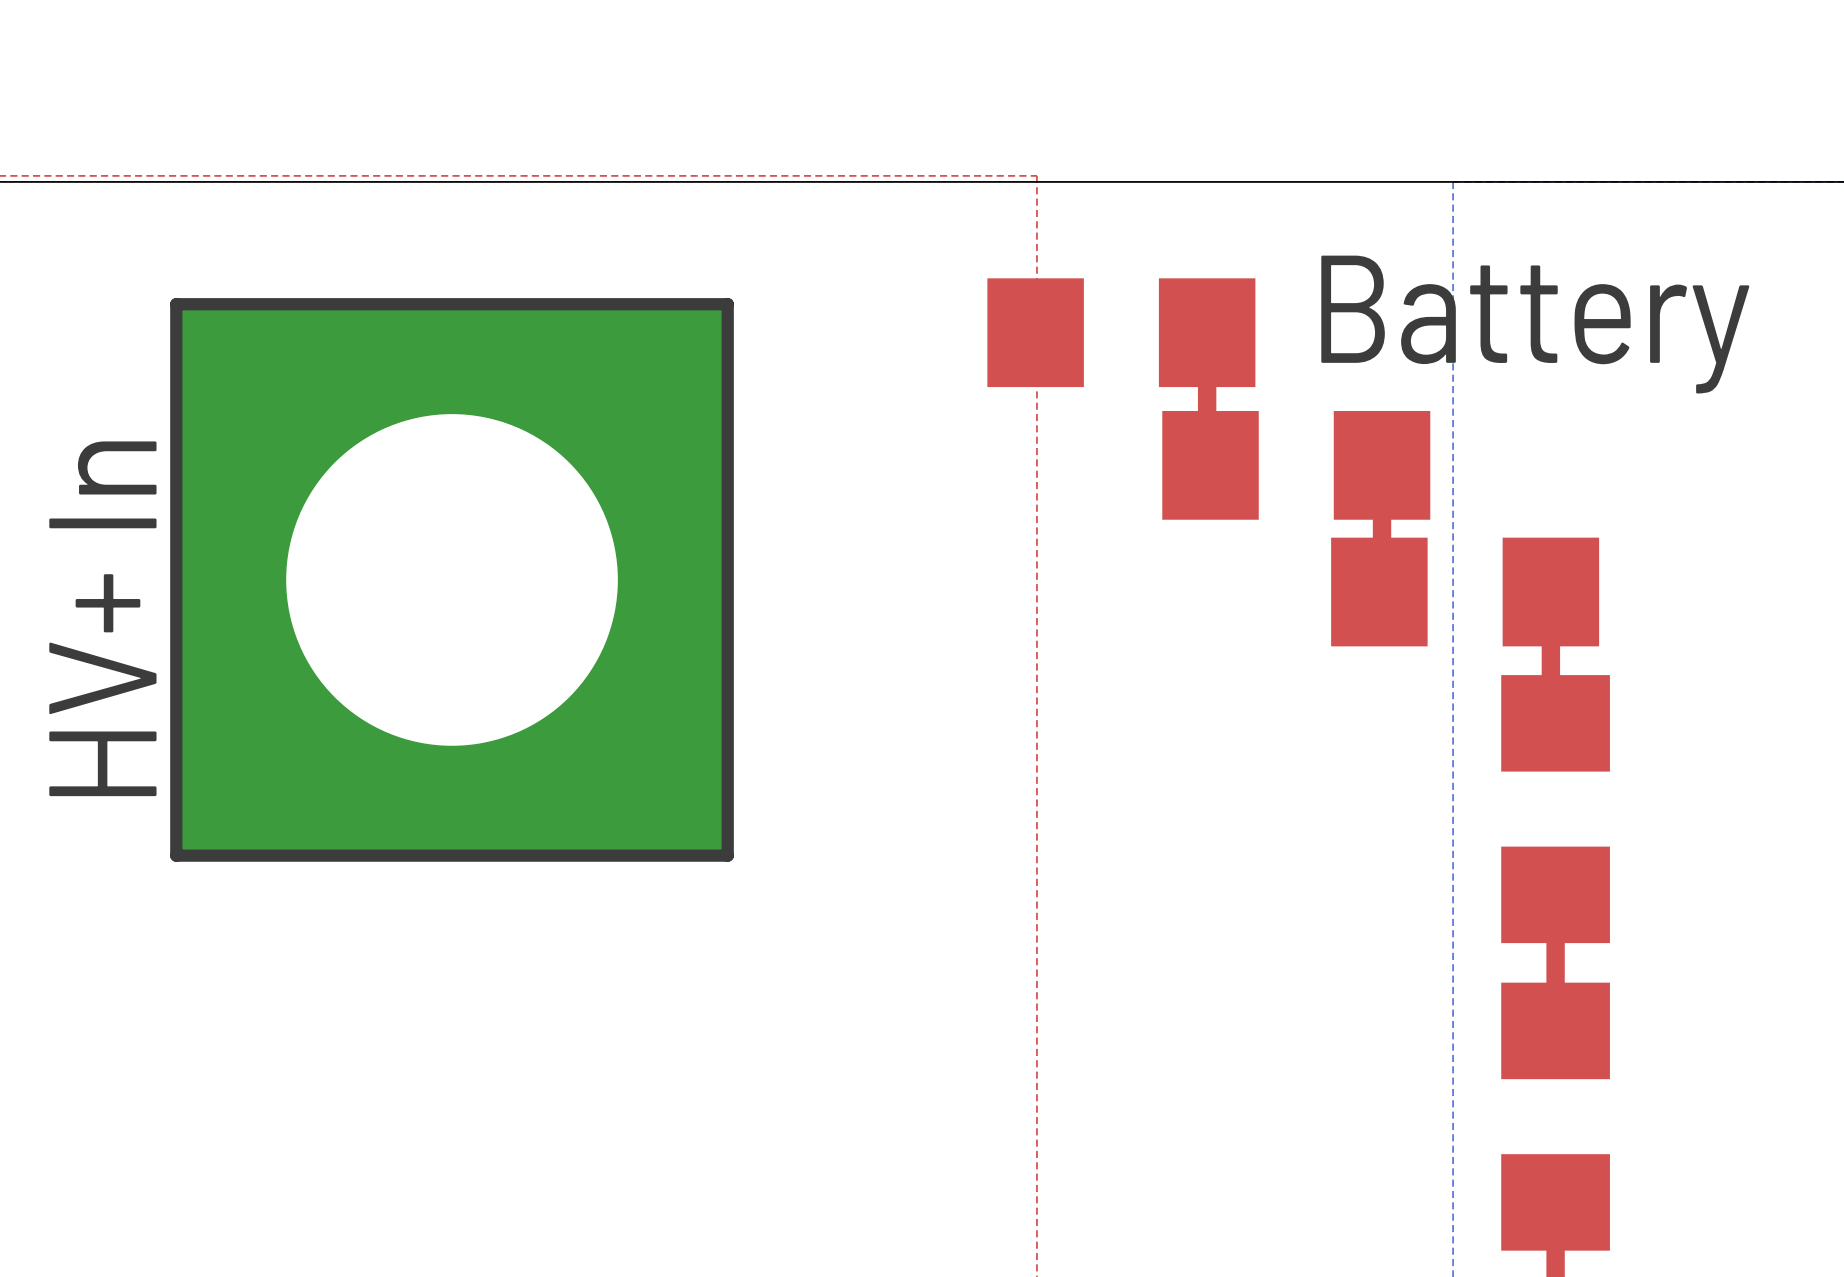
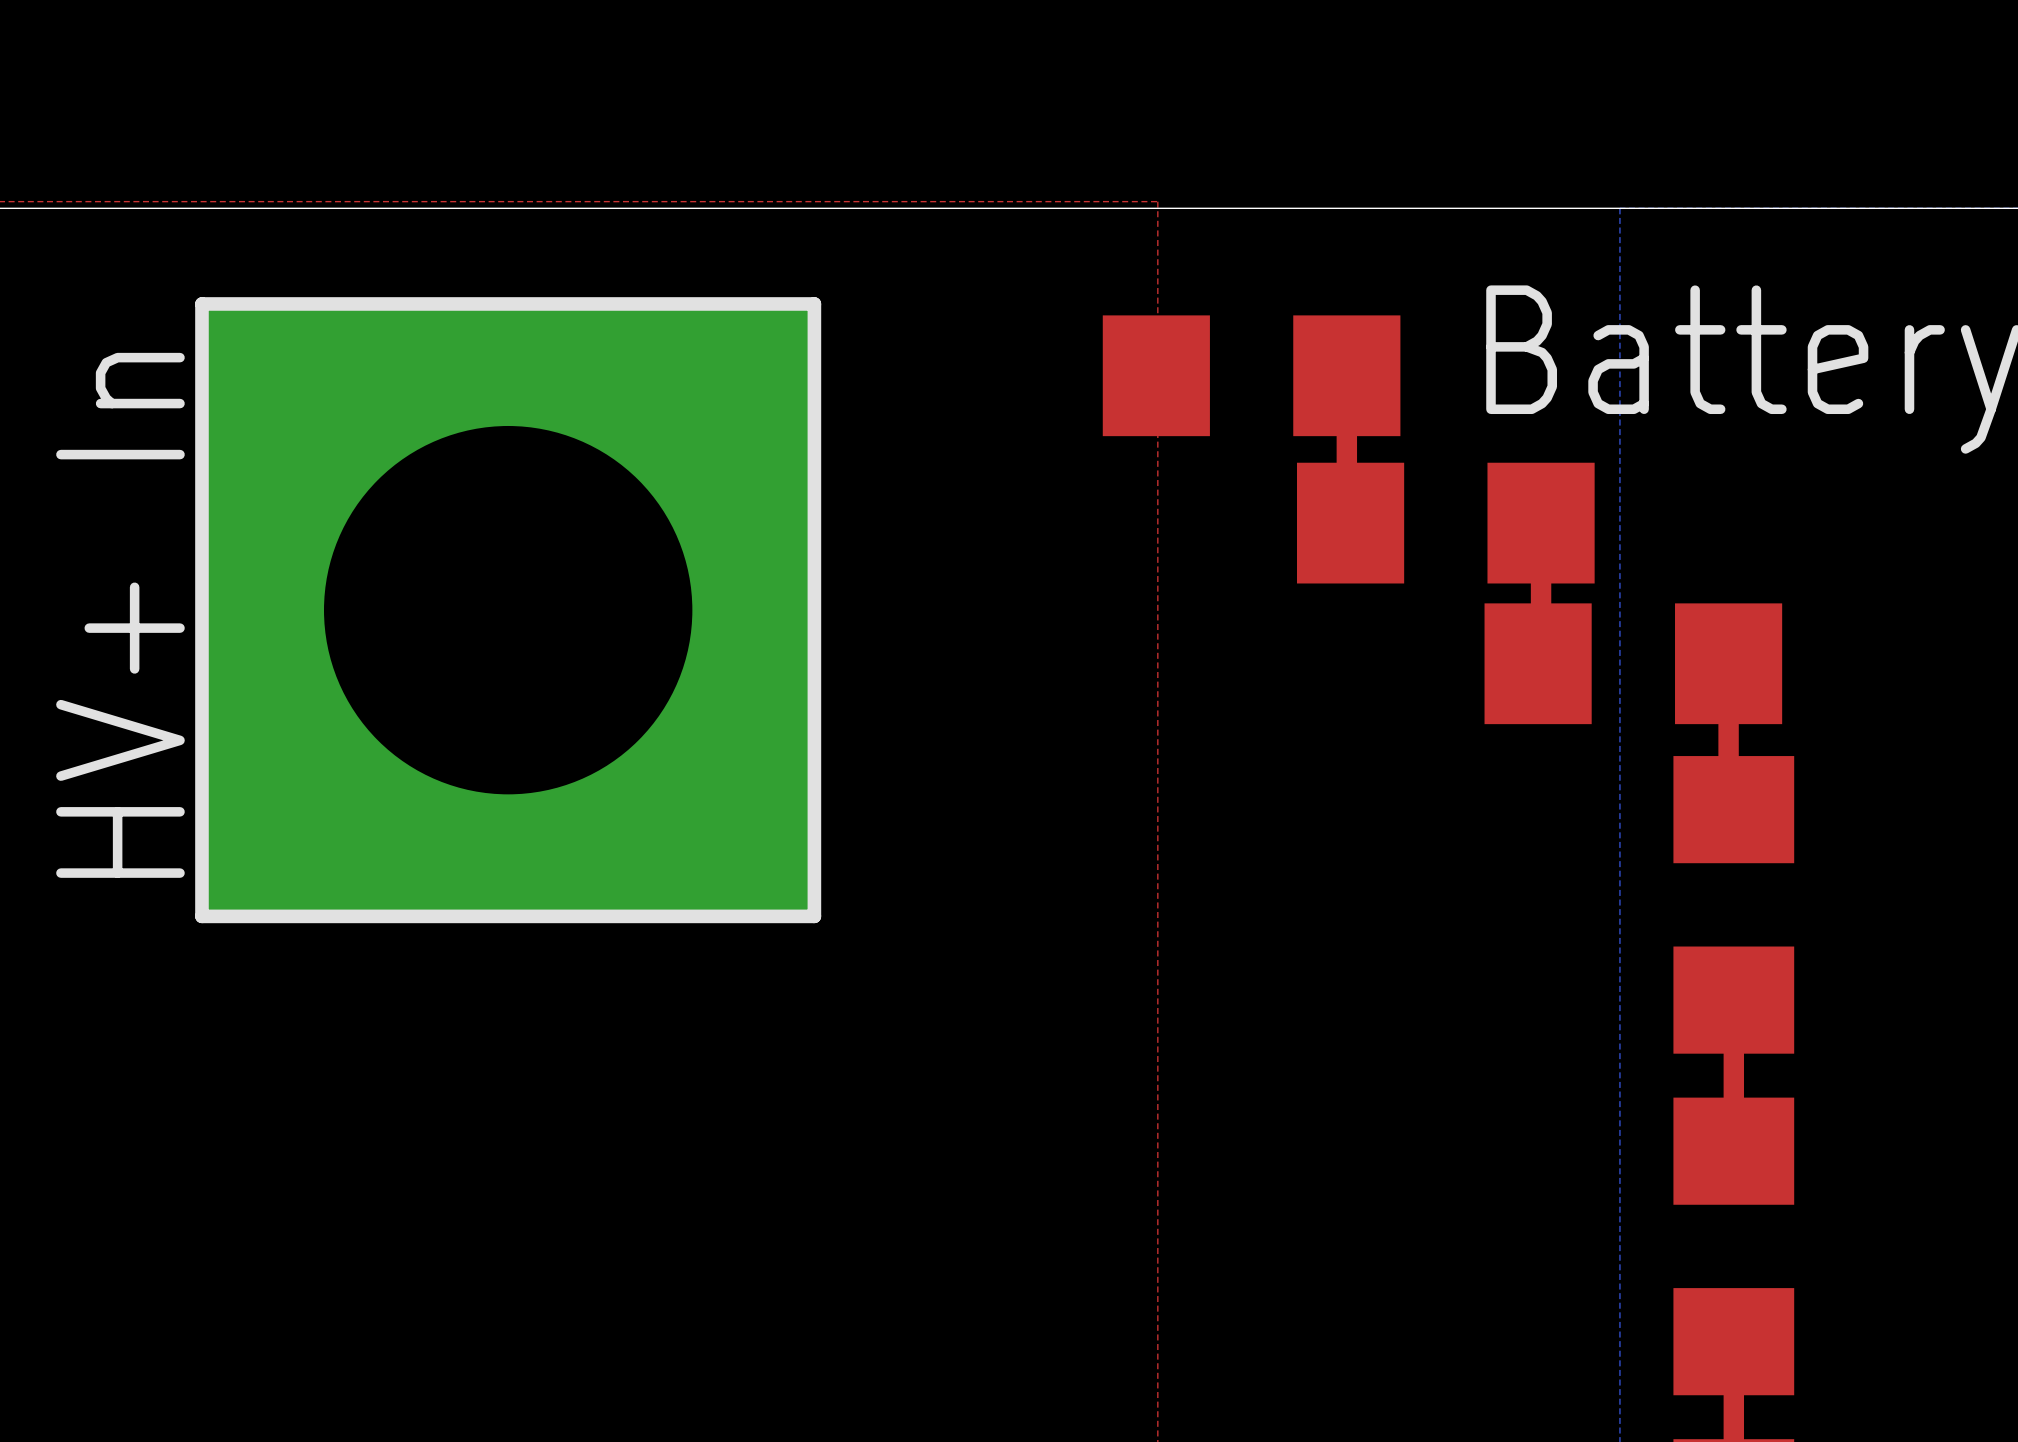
part position: (452, 579) -> (508, 610)

